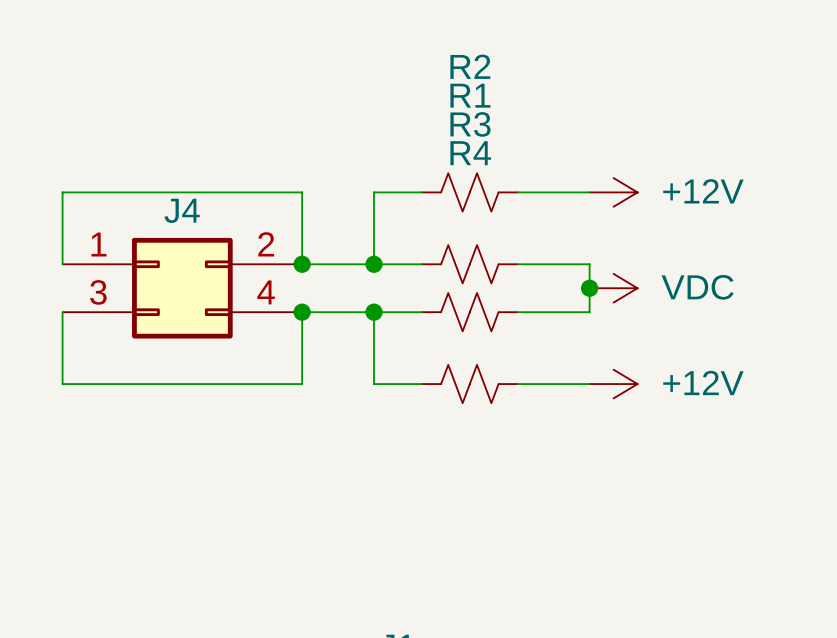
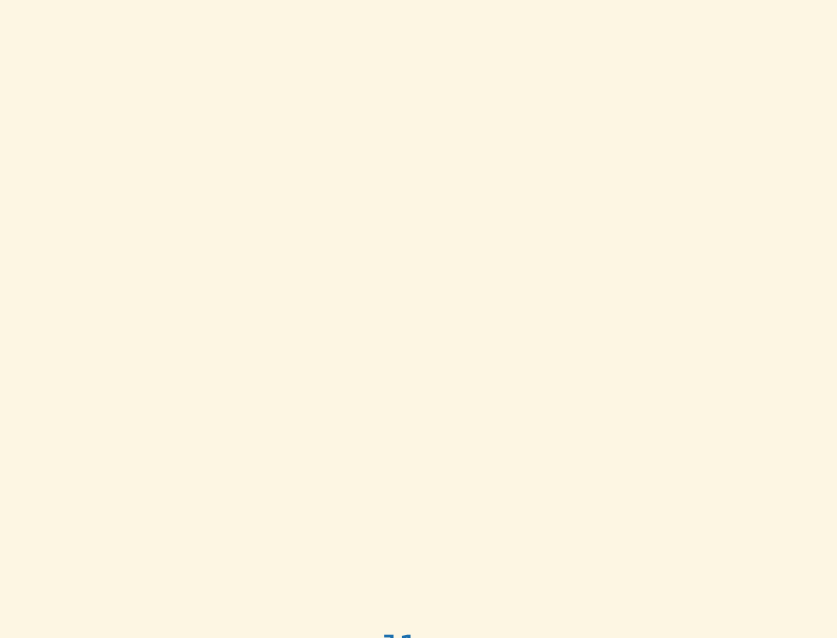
wire: (421, 192) (374, 192) (374, 264) -> none
R2: (469, 192) -> none
wire: (517, 192) (589, 192) -> none
power symbol: +12V (613, 192) -> none
wire: (62, 264) (62, 192) (302, 192) (302, 264) (421, 264) -> none
junction: (302, 264) -> none
junction: (374, 264) -> none
R1: (469, 264) -> none
wire: (517, 264) (589, 264) (589, 312) (517, 312) -> none
J4: (182, 288) -> none
junction: (589, 288) -> none
power symbol: VDC (613, 288) -> none
wire: (62, 312) (62, 384) (302, 384) (302, 312) (421, 312) -> none
junction: (302, 312) -> none
wire: (374, 312) (374, 384) (421, 384) -> none
junction: (374, 312) -> none
R3: (469, 312) -> none
R4: (469, 384) -> none
wire: (517, 384) (589, 384) -> none
power symbol: +12V (613, 384) -> none

